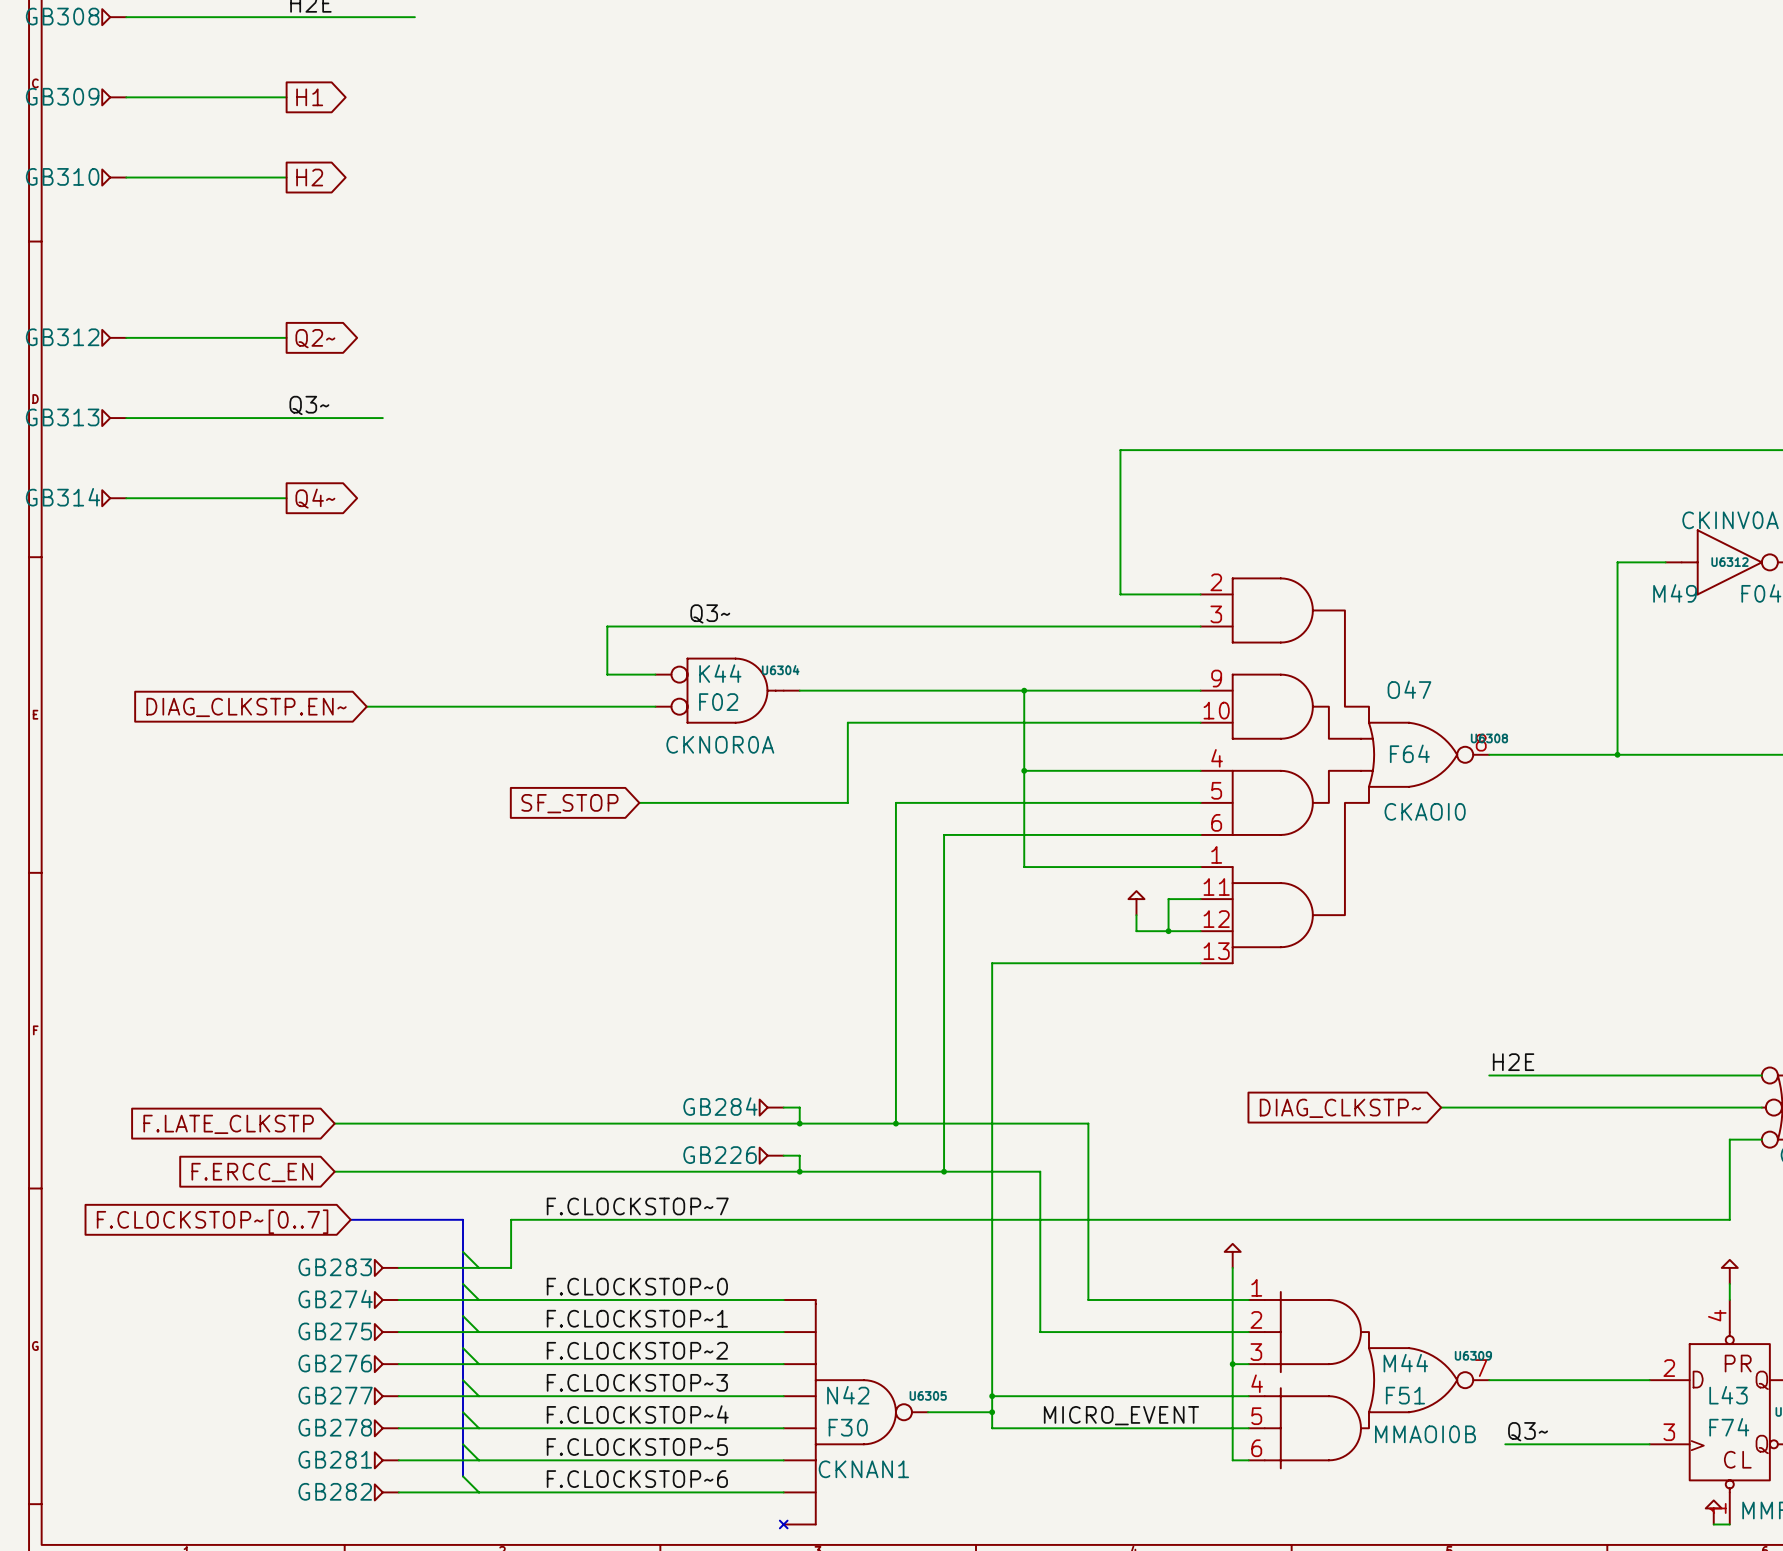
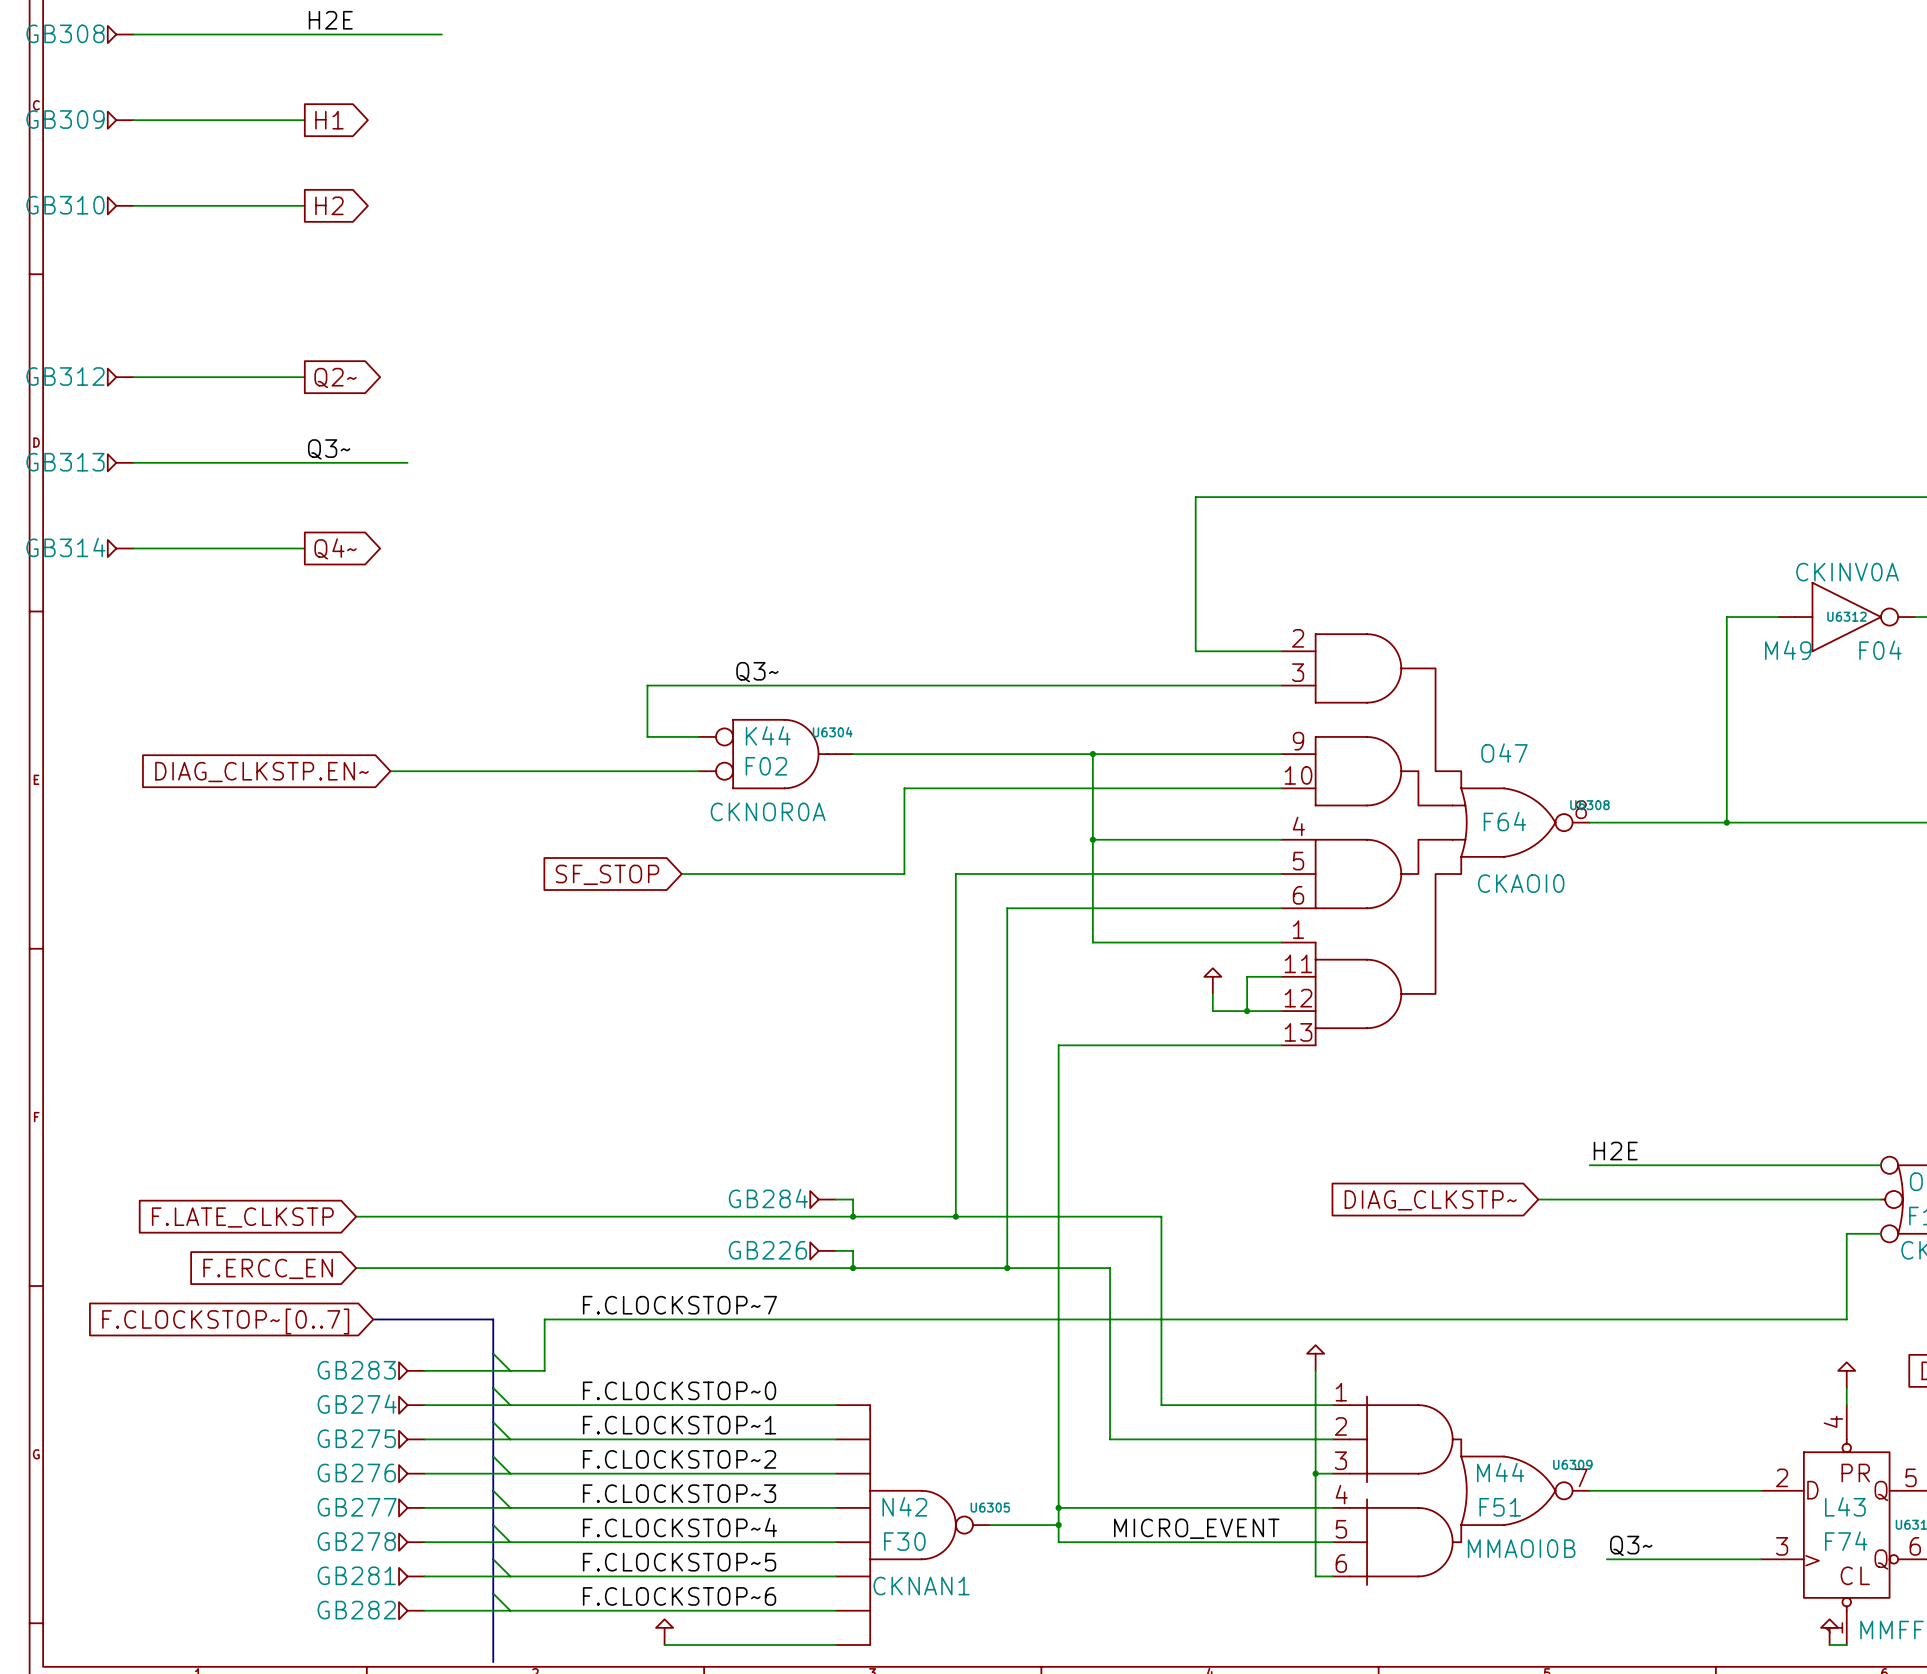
bus: none -> (493, 1593) (493, 1662)
power symbol: none -> (664, 1631)
wire: none -> (664, 1644) (835, 1644)
no-connect mark: (783, 1524) -> none

